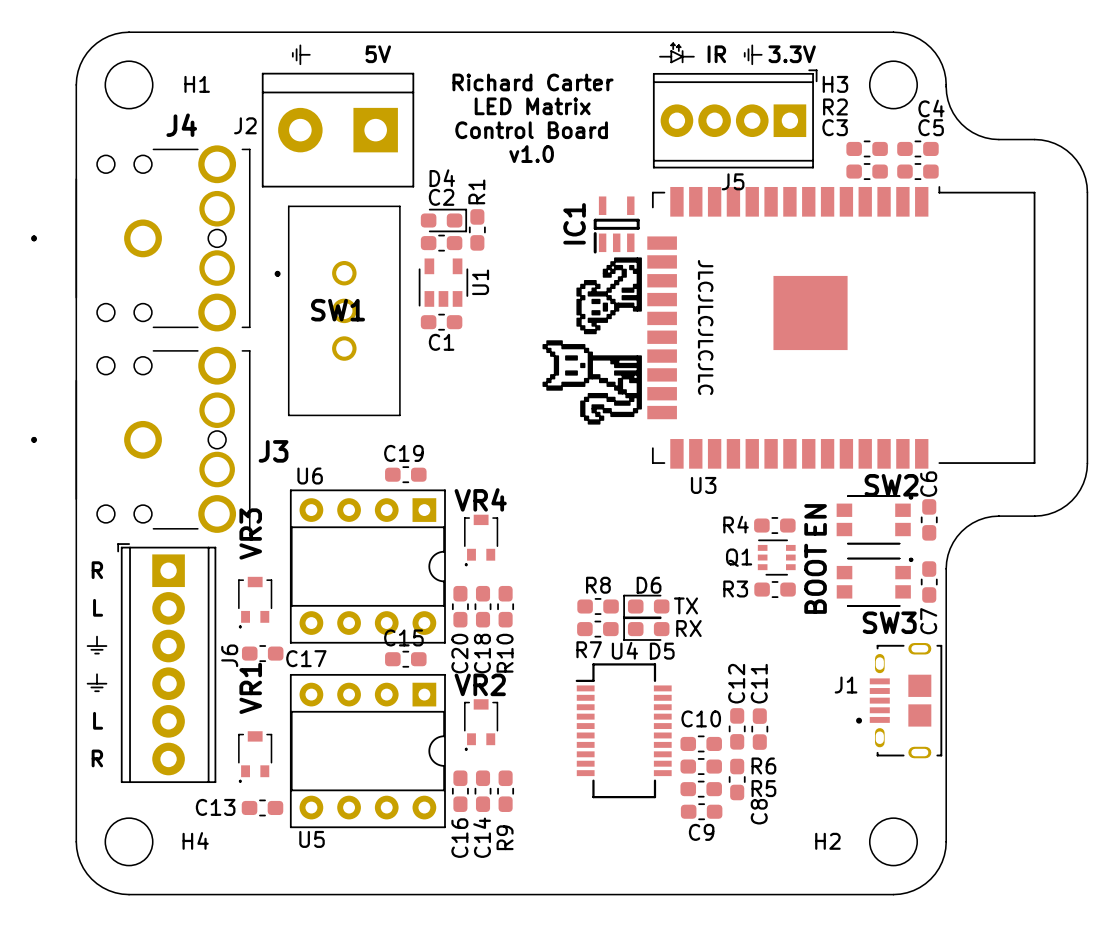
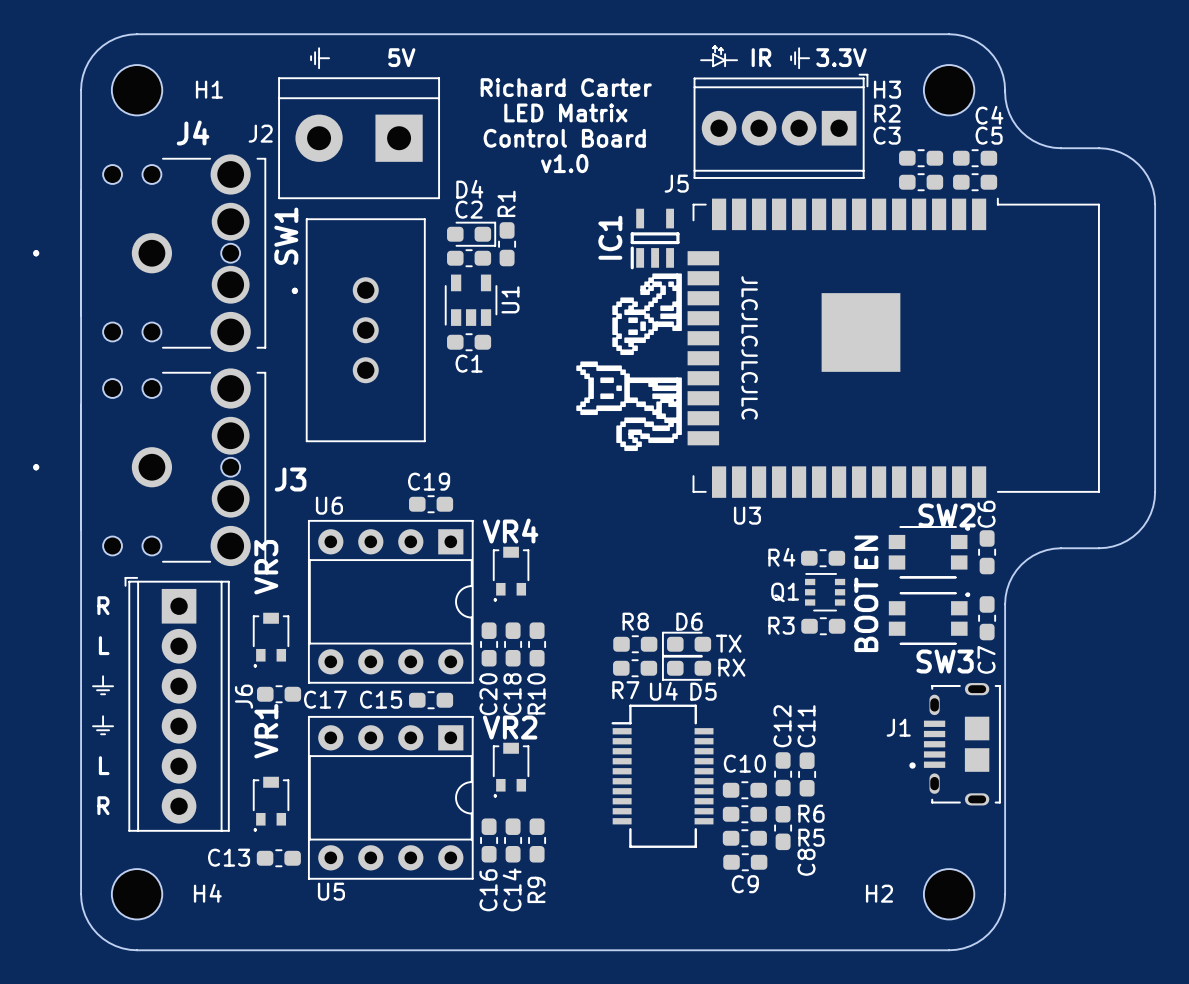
J5 name position: J5 (733, 181) -> J5 (676, 183)
SW1 name rotation: 0° (338, 310) -> 90° counterclockwise (286, 236)
SW1 name position: SW1 (338, 310) -> SW1 (286, 236)
C15 name position: C15 (403, 637) -> C15 (381, 699)

